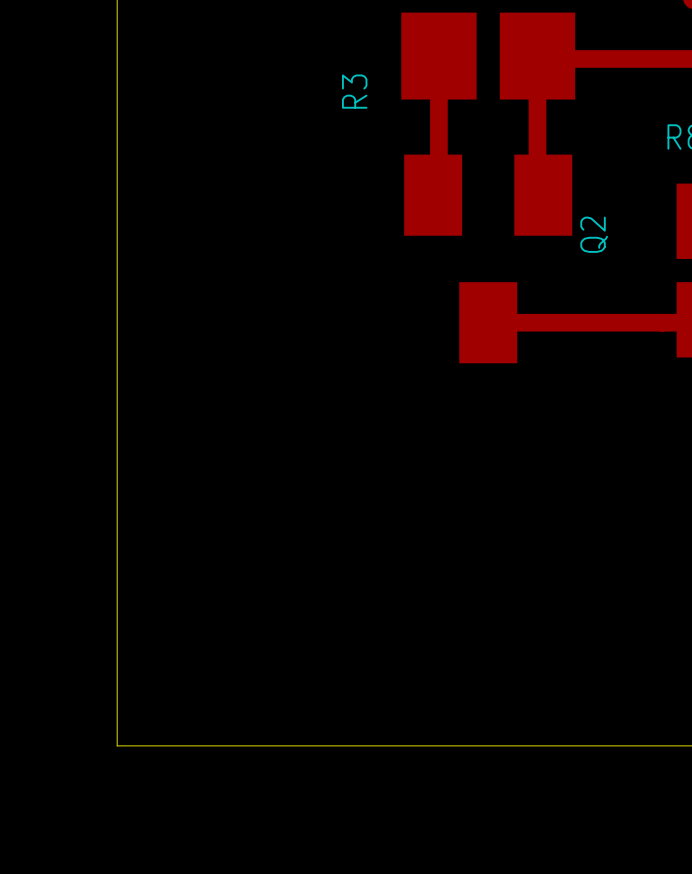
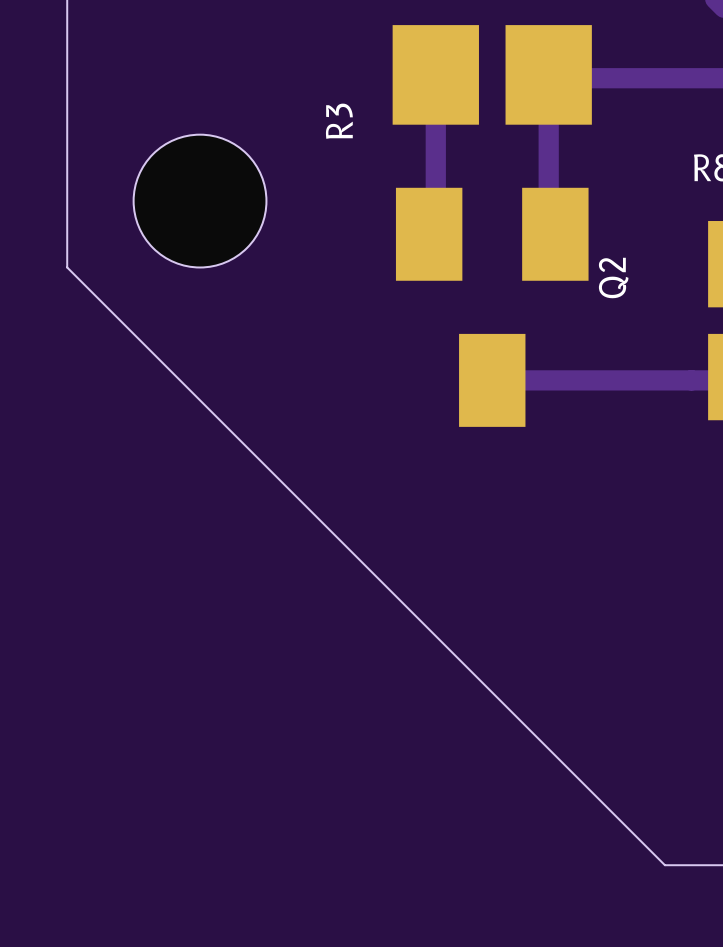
hole: none -> (200, 201)
board edge: (117, 224) (117, 745) (638, 745) -> (67, 267) (664, 865)

